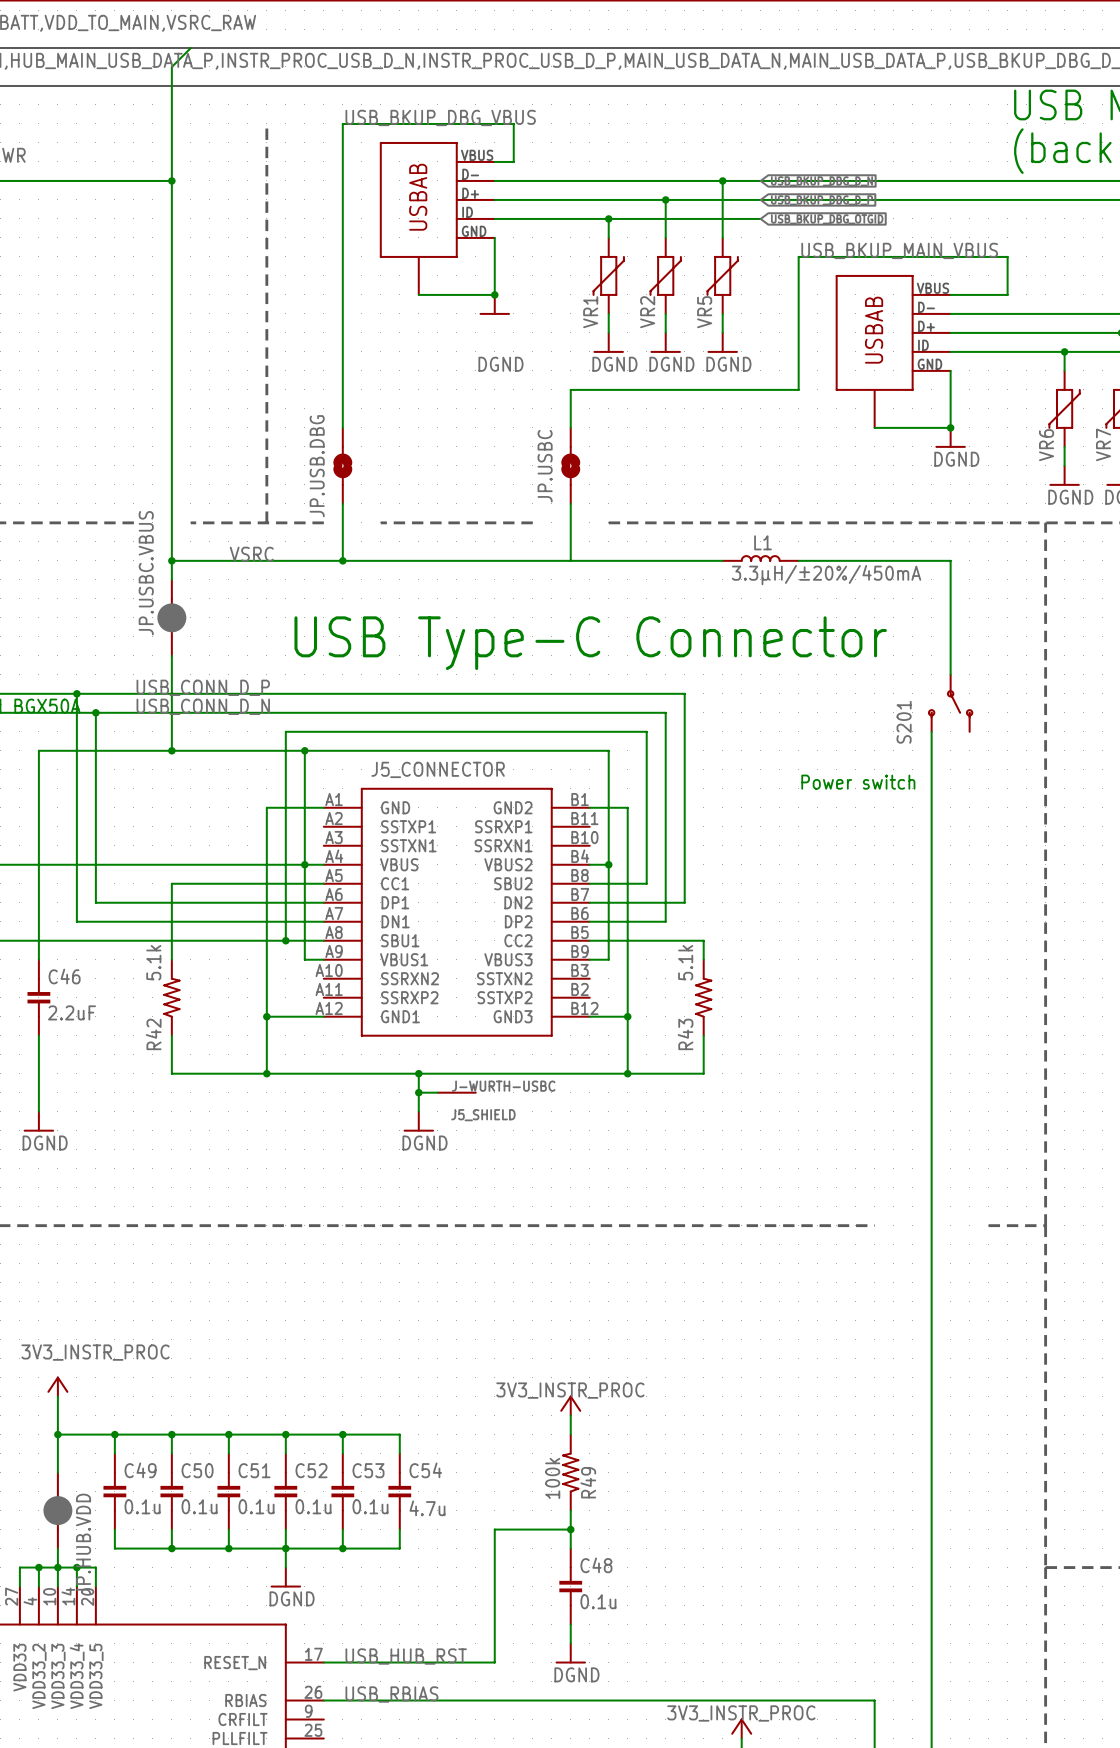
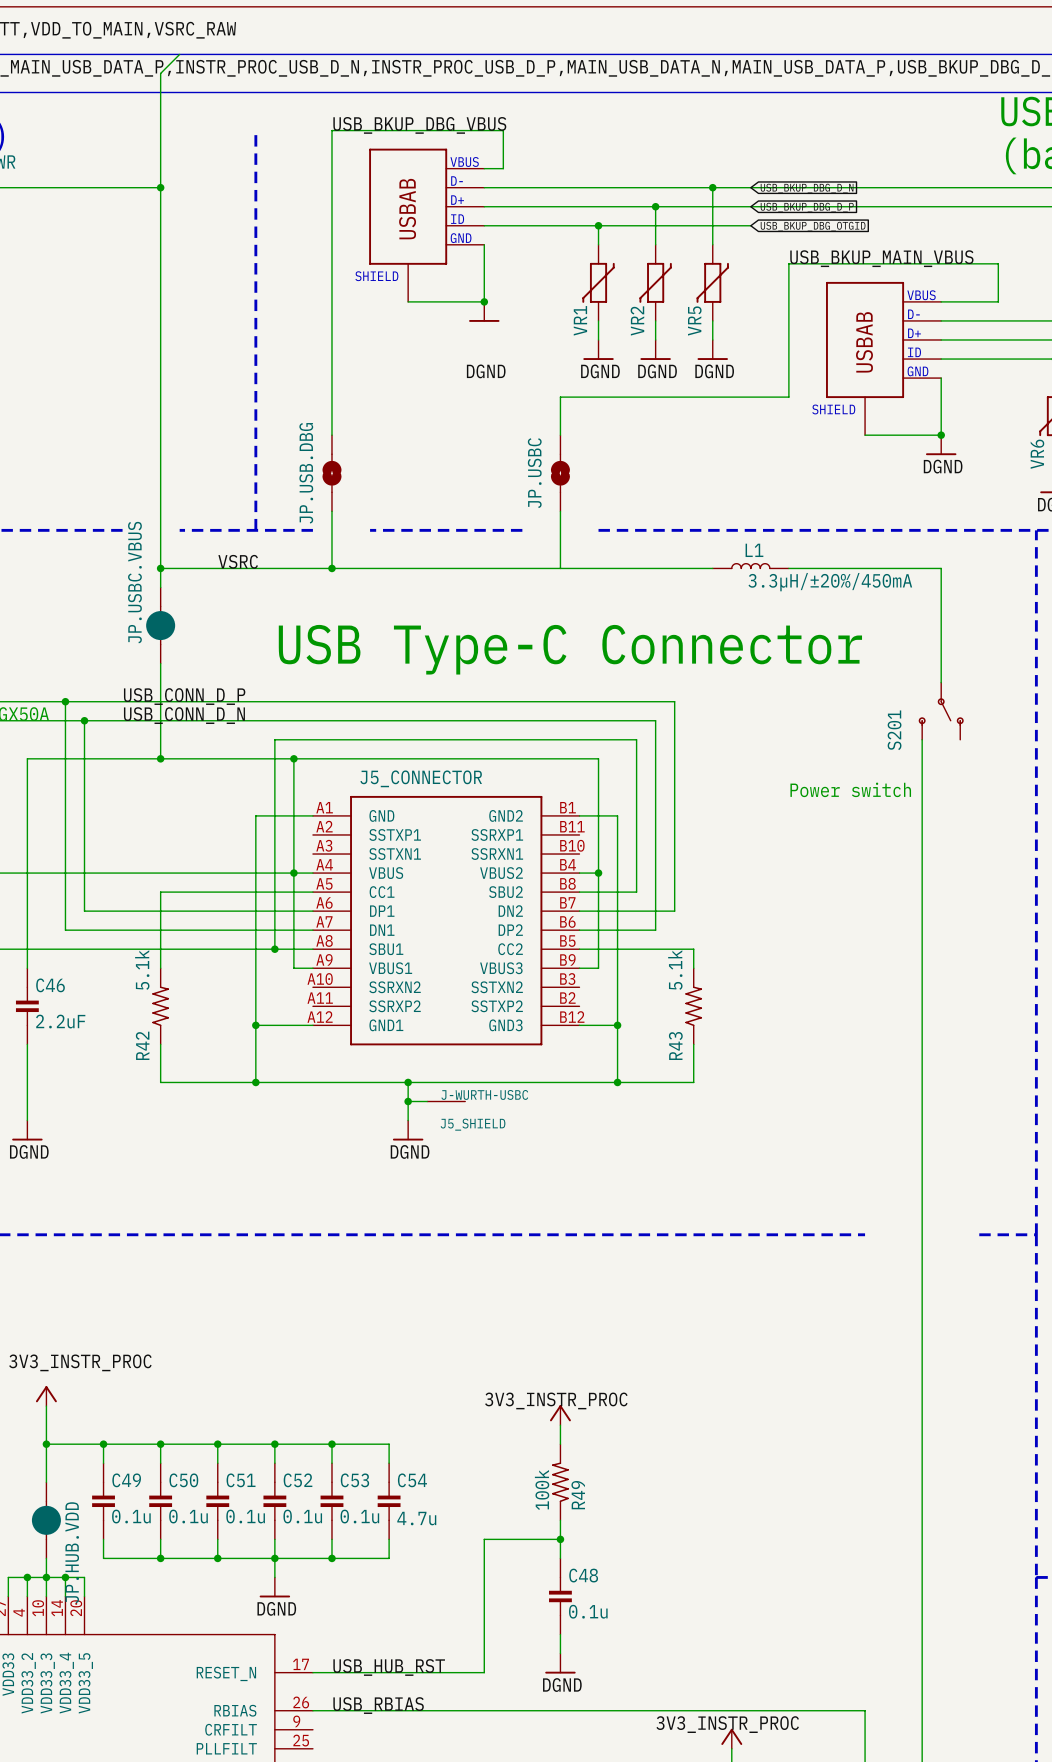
part text: none -> SHIELD (376, 276)
part text: none -> SHIELD (833, 409)

